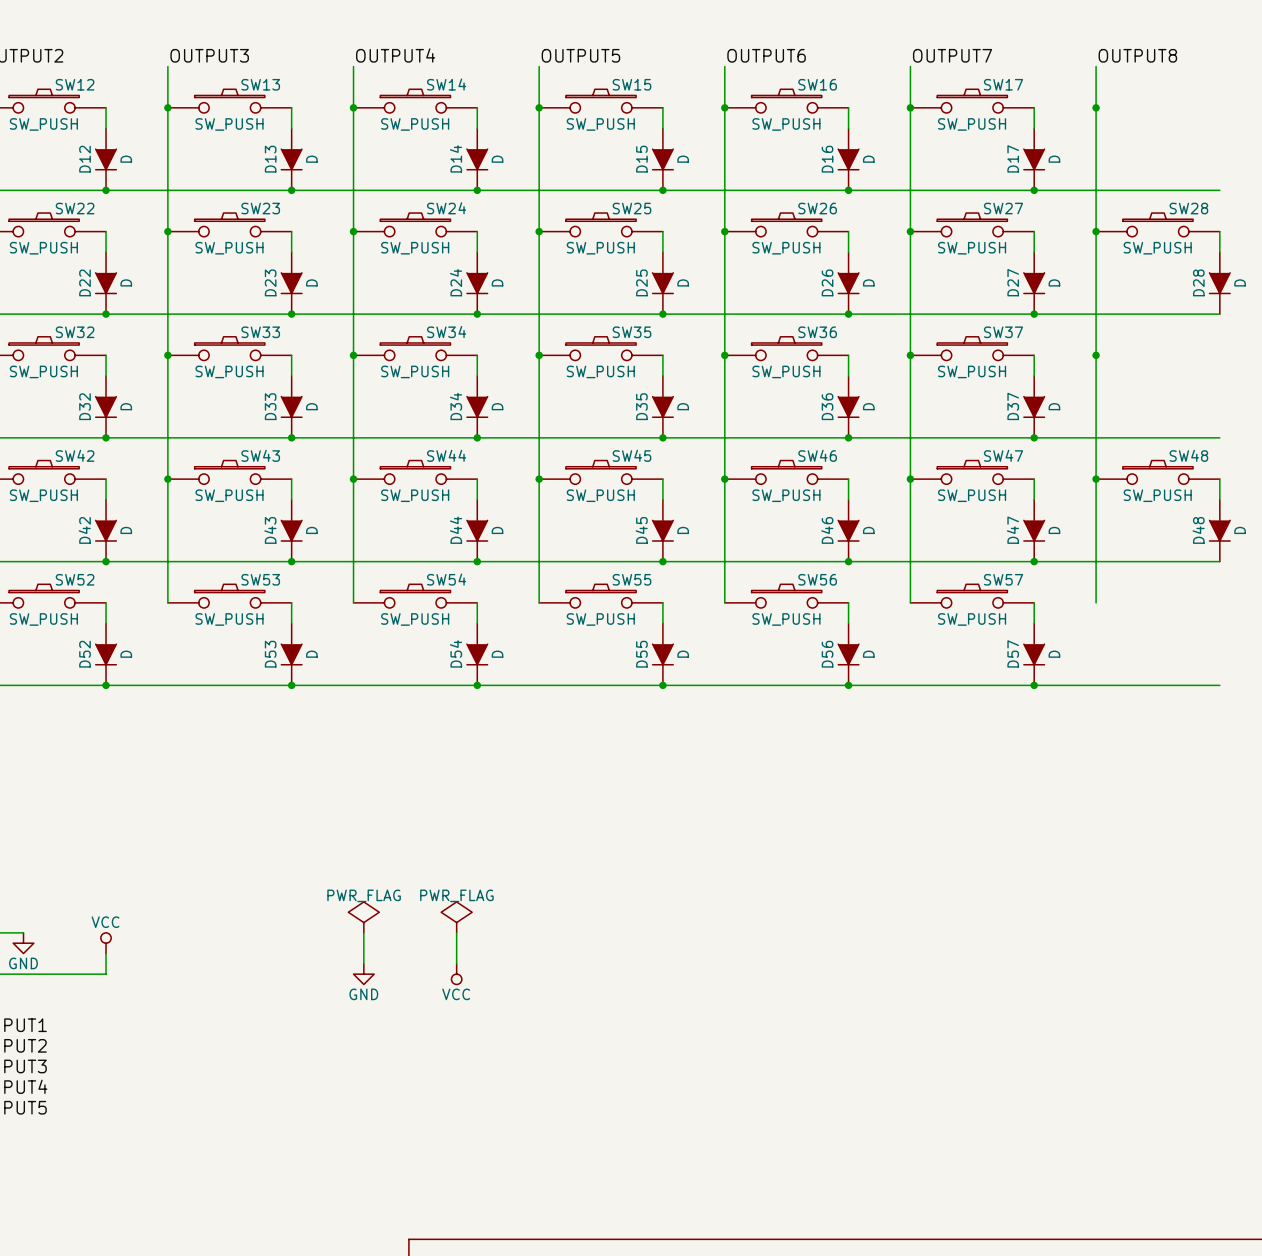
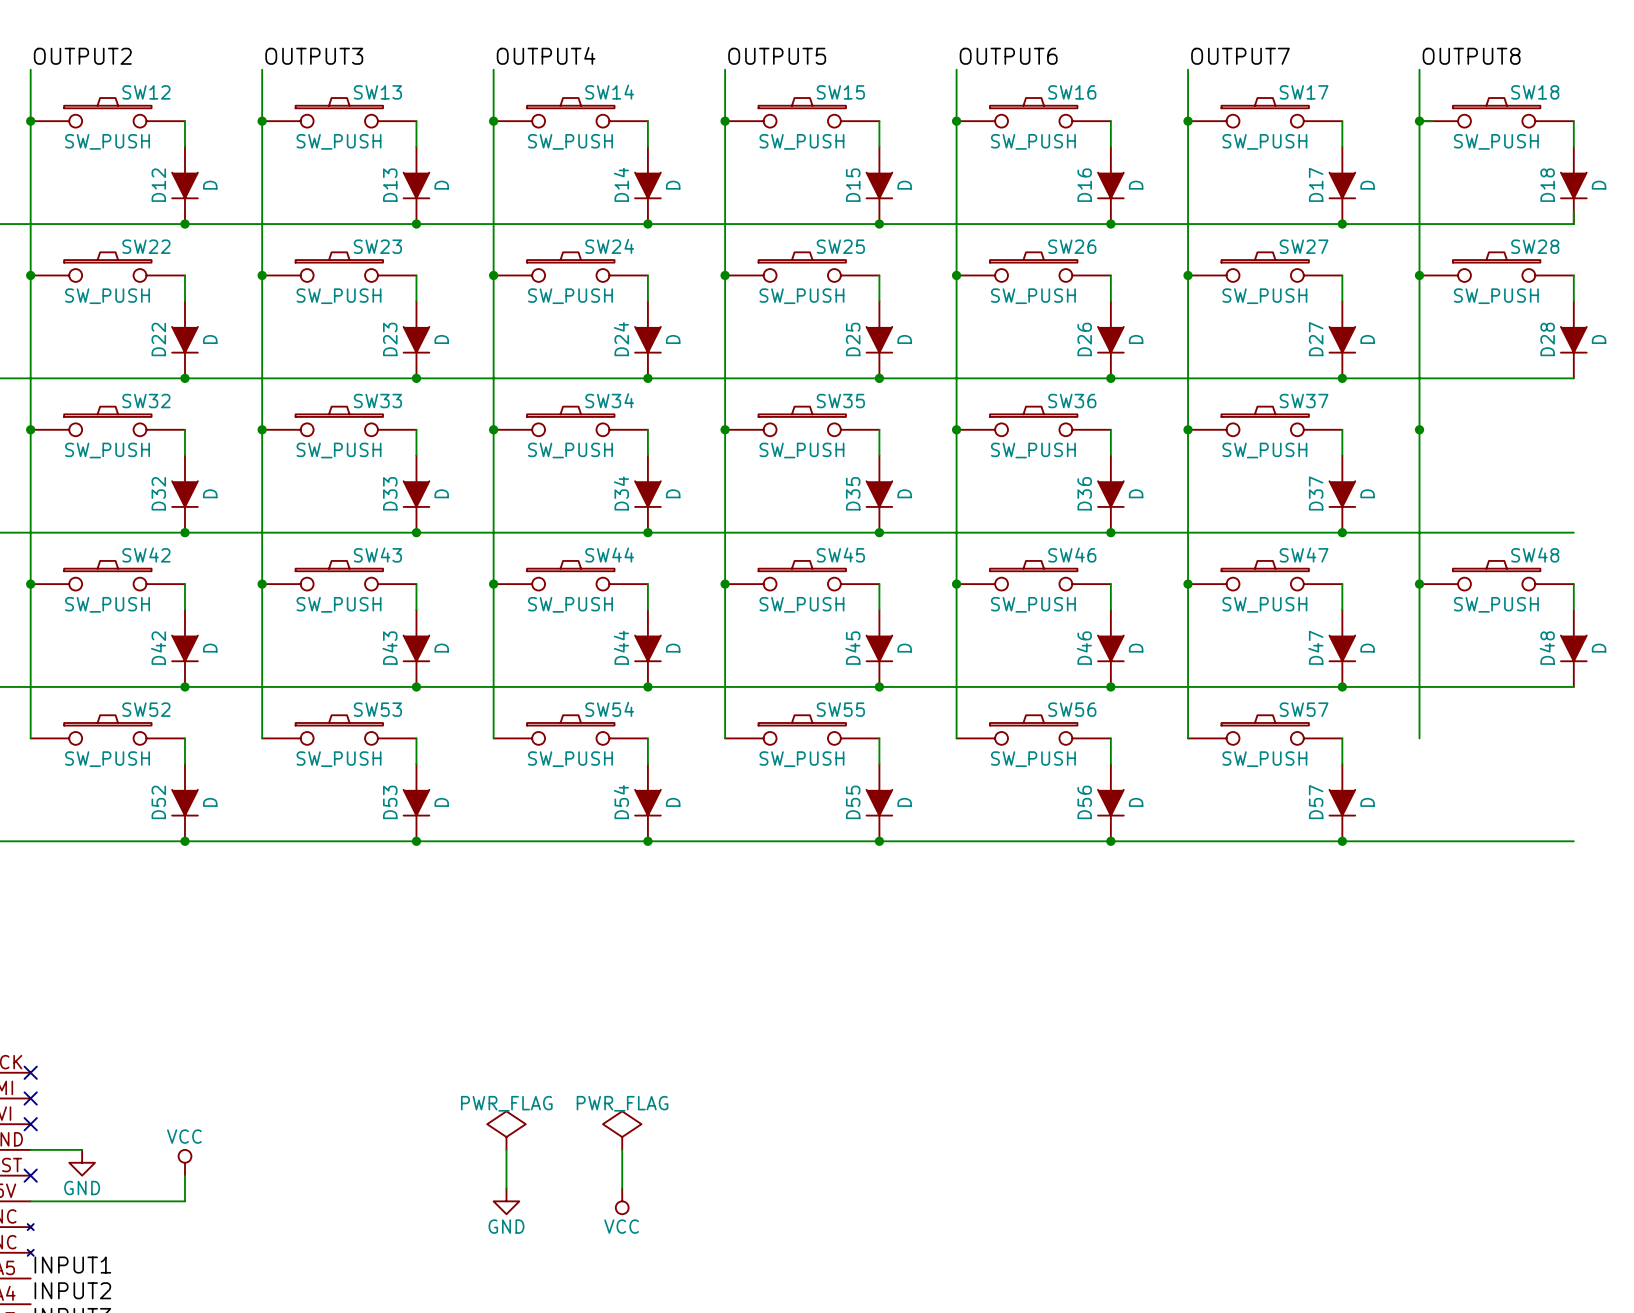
SW18: none -> SW_PUSH (1496, 112)
wire: none -> (1419, 121) (1432, 121)
wire: none -> (1573, 121) (1573, 146)
D18: none -> D (1573, 185)
wire: none -> (1573, 211) (1573, 224)

